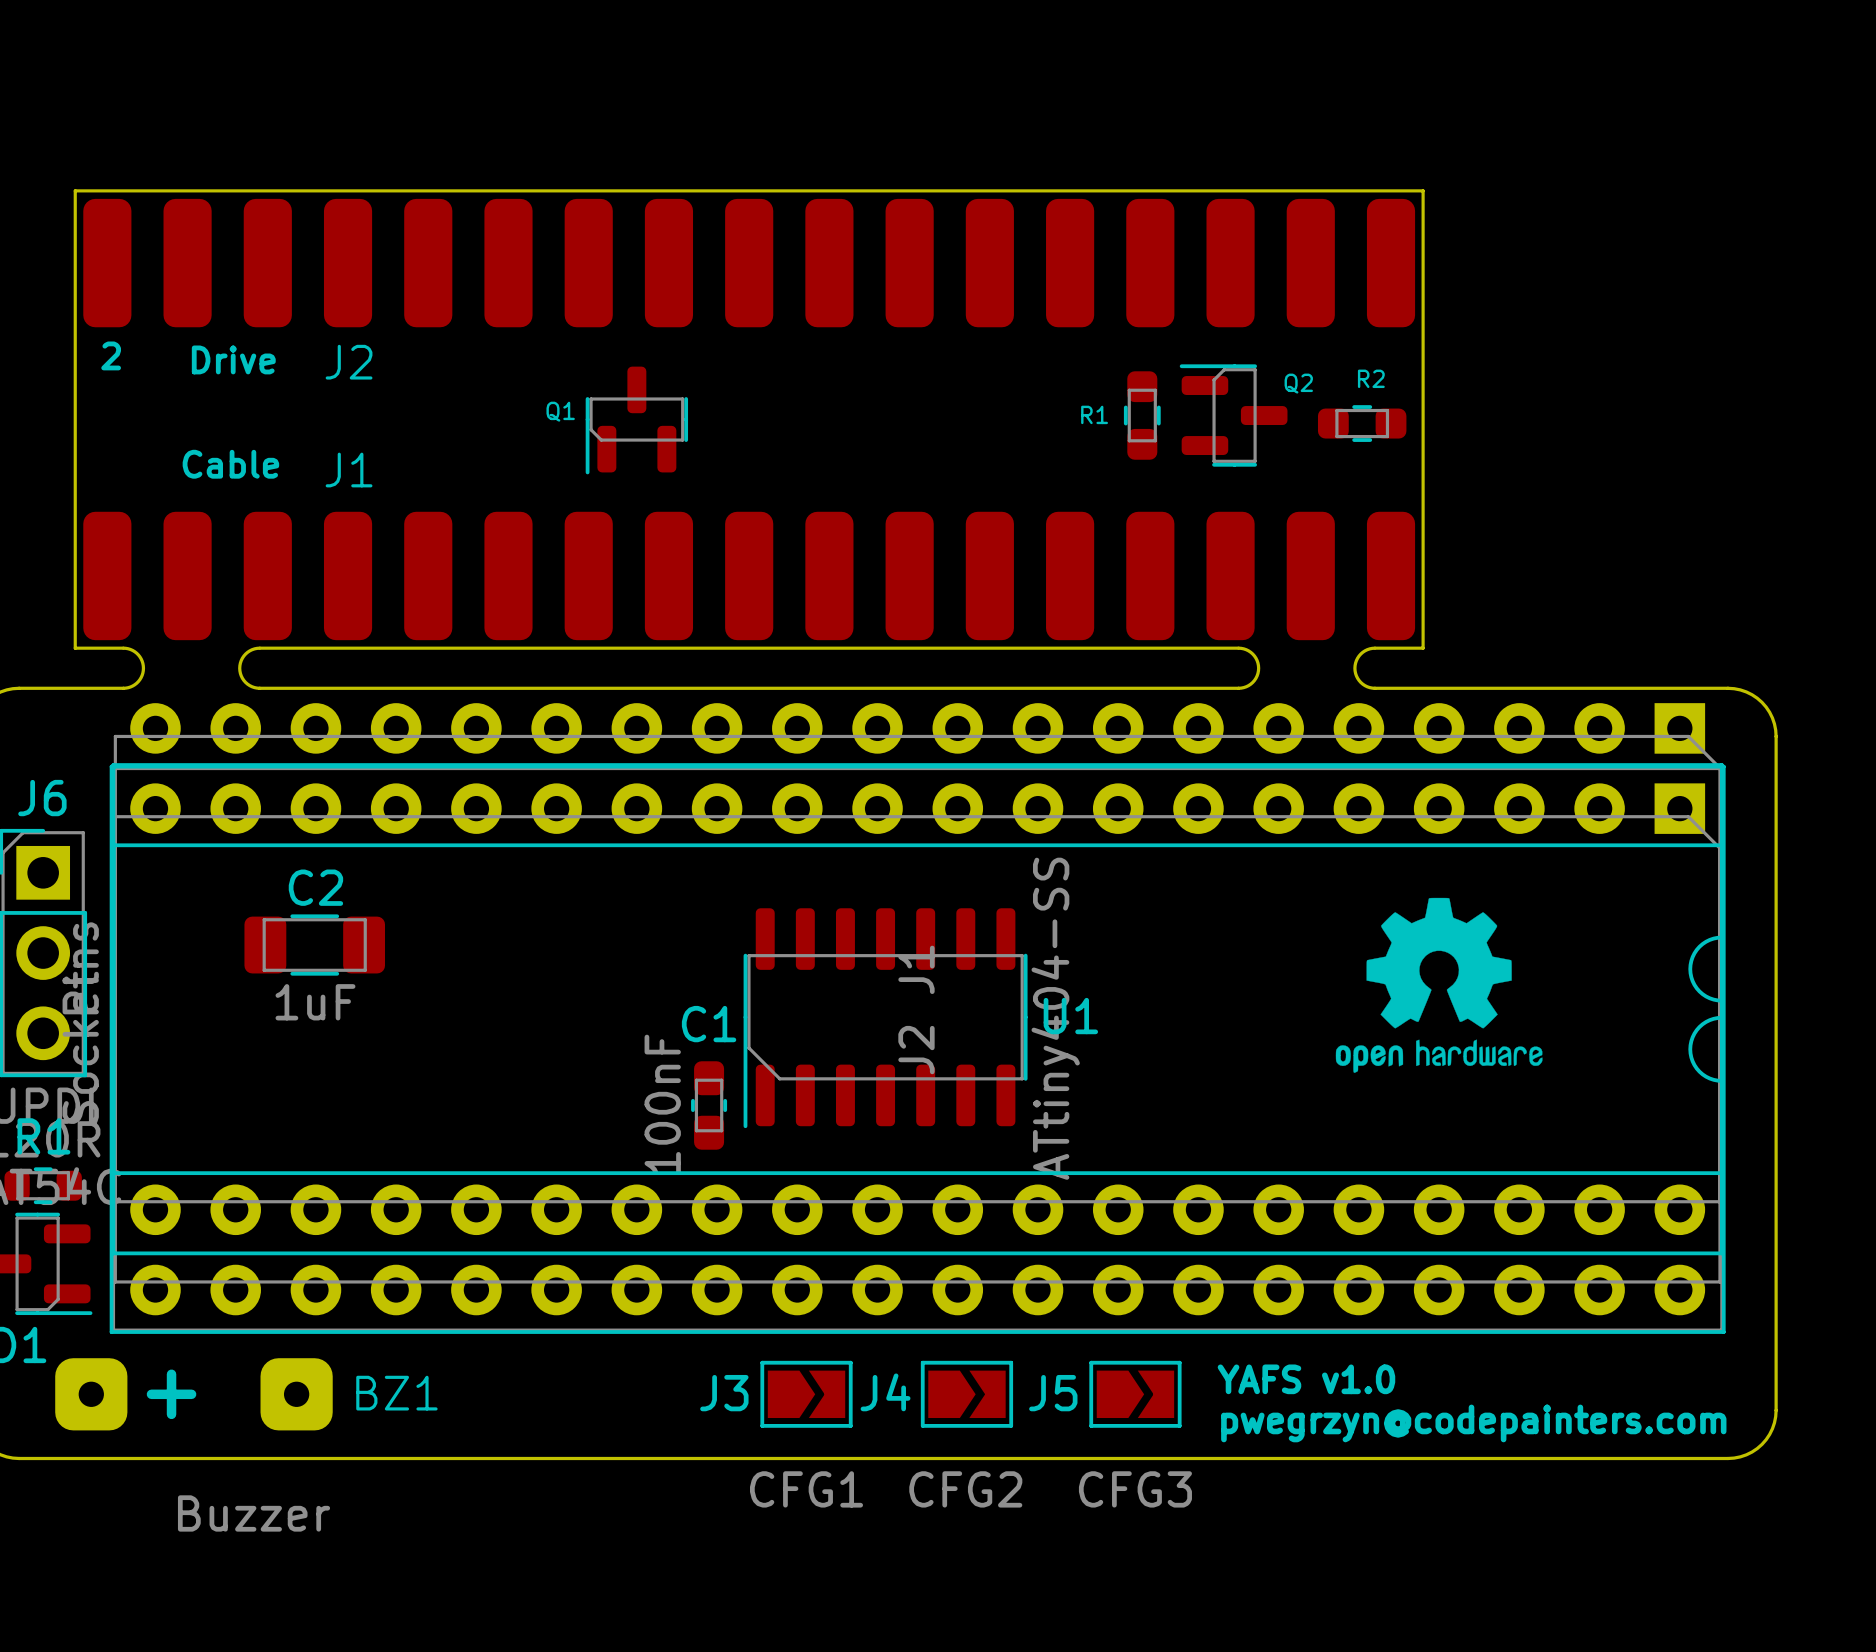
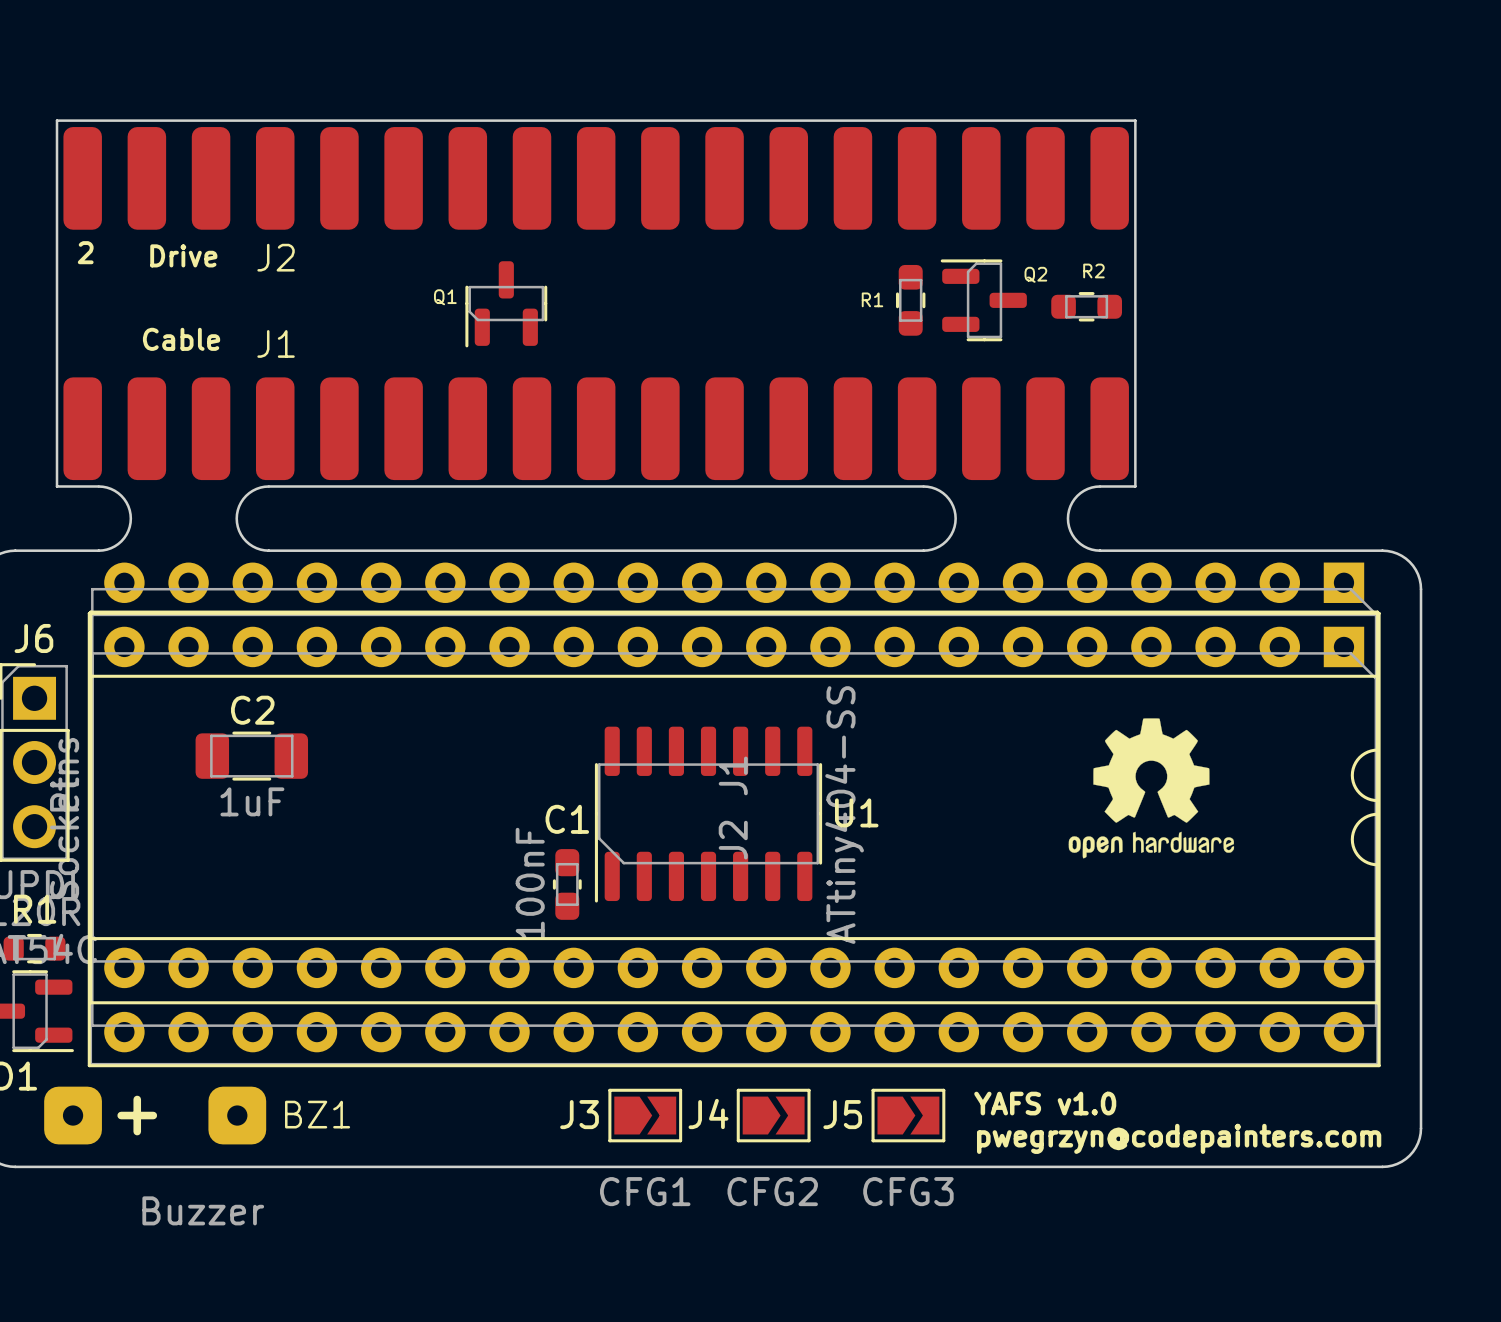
J2 position: (749, 263) -> (596, 178)
text position: 2 (111, 355) -> 2 (85, 252)
text position: Drive (233, 359) -> Drive (183, 255)
R1 position: (1142, 415) -> (910, 300)
Q2 position: (1233, 415) -> (983, 300)
Q1 position: (636, 420) -> (506, 304)
R2 position: (1362, 423) -> (1086, 306)
text position: Cable (230, 464) -> Cable (181, 339)
J1 position: (749, 575) -> (596, 428)
board edge: (123, 688) (134, 684) (142, 675) (142, 663) (136, 653) (125, 648) (75, 648) (75, 190) (1423, 190) (1423, 648) (1372, 648) (1362, 652) (1355, 663) (1356, 675) (1364, 685) (1374, 688) -> (98, 550) (114, 546) (126, 534) (130, 518) (126, 502) (118, 493) (107, 487) (57, 486) (57, 120) (1135, 120) (1135, 486) (1100, 486) (1087, 488) (1074, 499) (1068, 514) (1069, 526) (1077, 541) (1087, 548) (1100, 550)
board edge: (336, 688) (254, 687) (247, 684) (242, 678) (239, 670) (240, 663) (247, 652) (259, 648) (1238, 648) (1250, 652) (1257, 663) (1258, 670) (1255, 678) (1250, 684) (1243, 687) (1154, 688) -> (268, 550) (256, 548) (246, 541) (239, 530) (236, 518) (239, 506) (246, 495) (256, 488) (268, 486) (927, 486) (935, 488) (946, 495) (953, 506) (955, 518) (953, 530) (946, 541) (935, 548) (923, 550)

